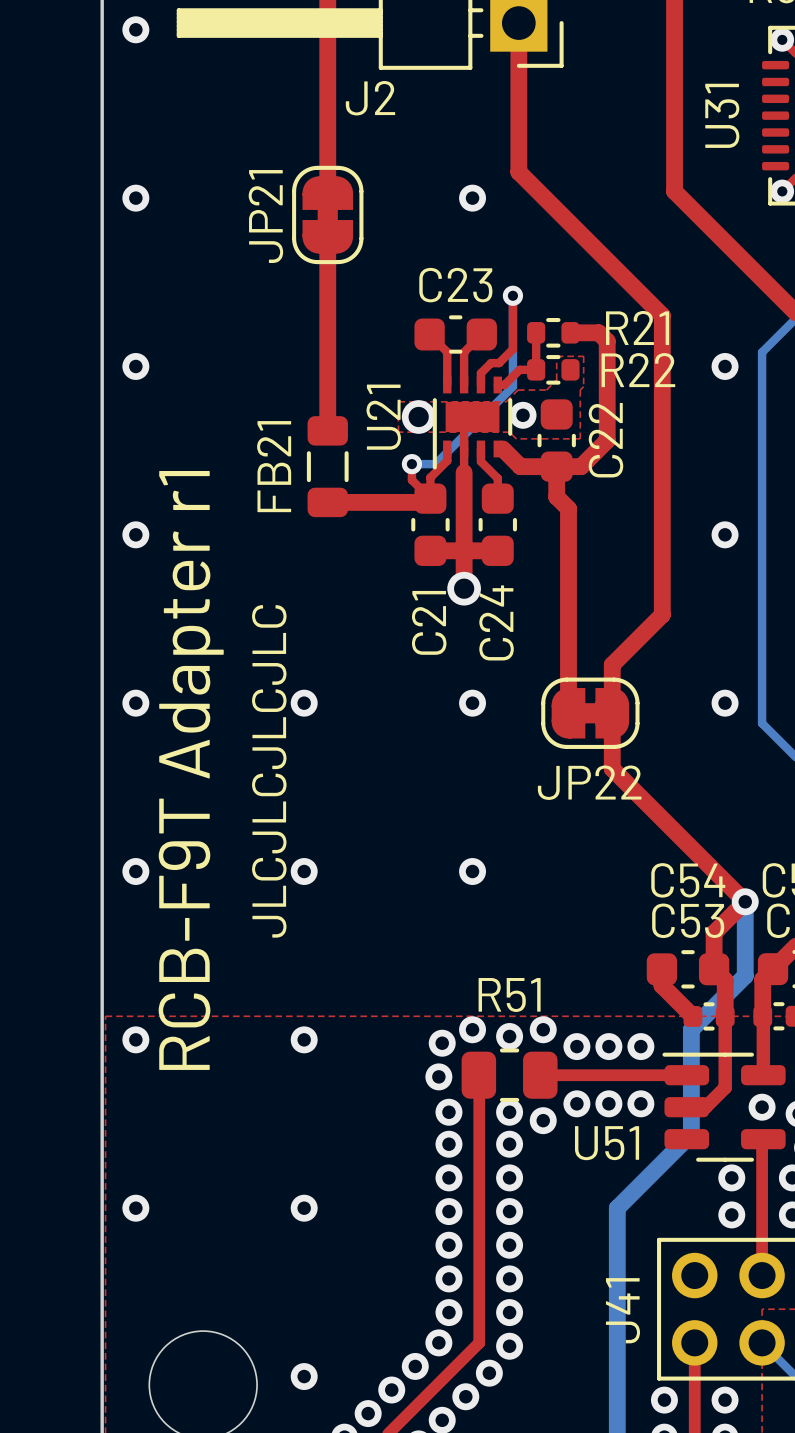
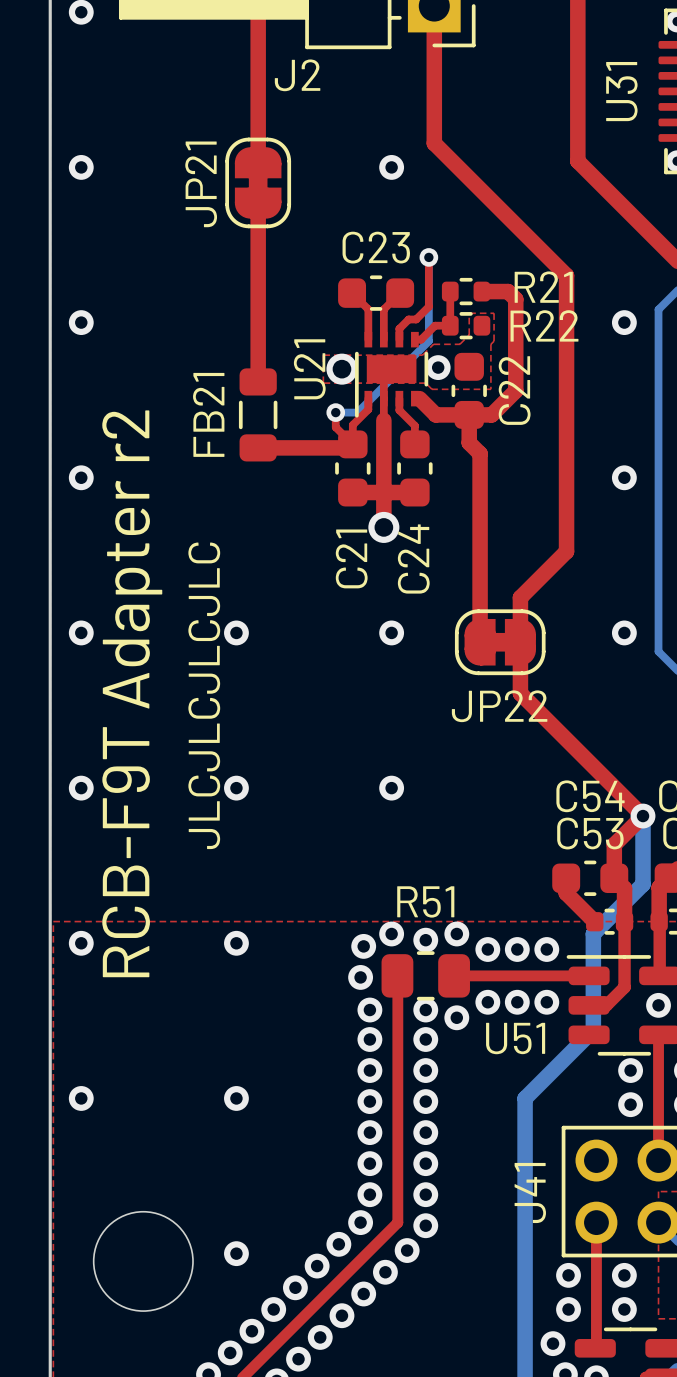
text: RCB-F9T Adapter r1 (191, 770) -> RCB-F9T Adapter r2 (132, 693)

